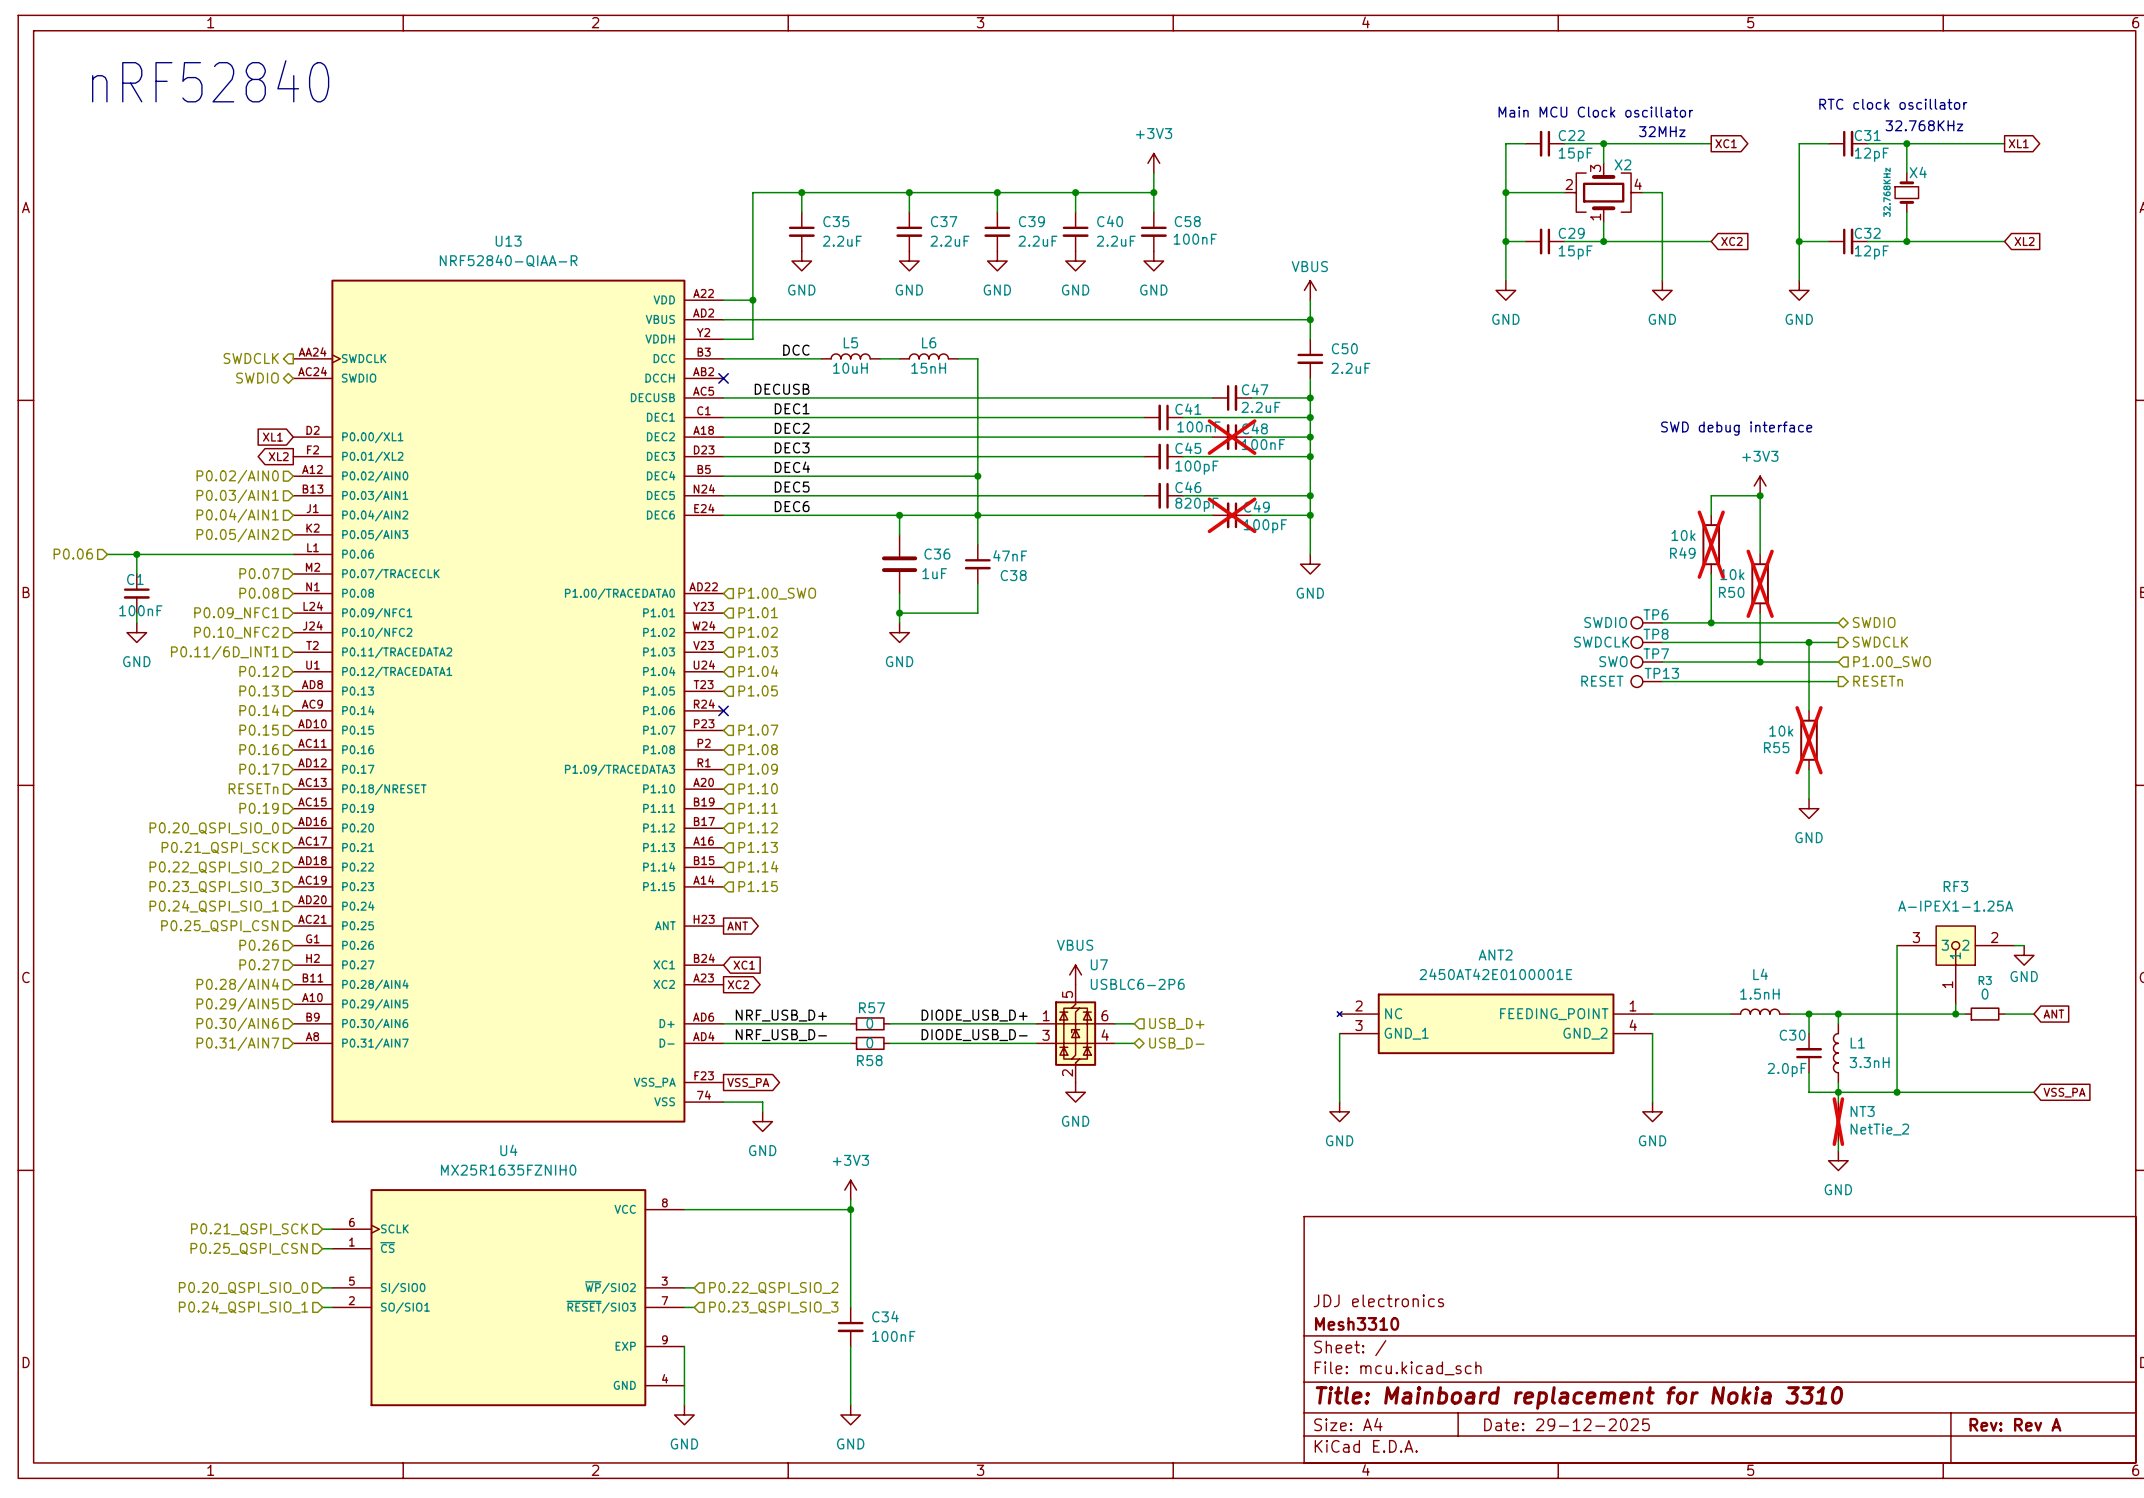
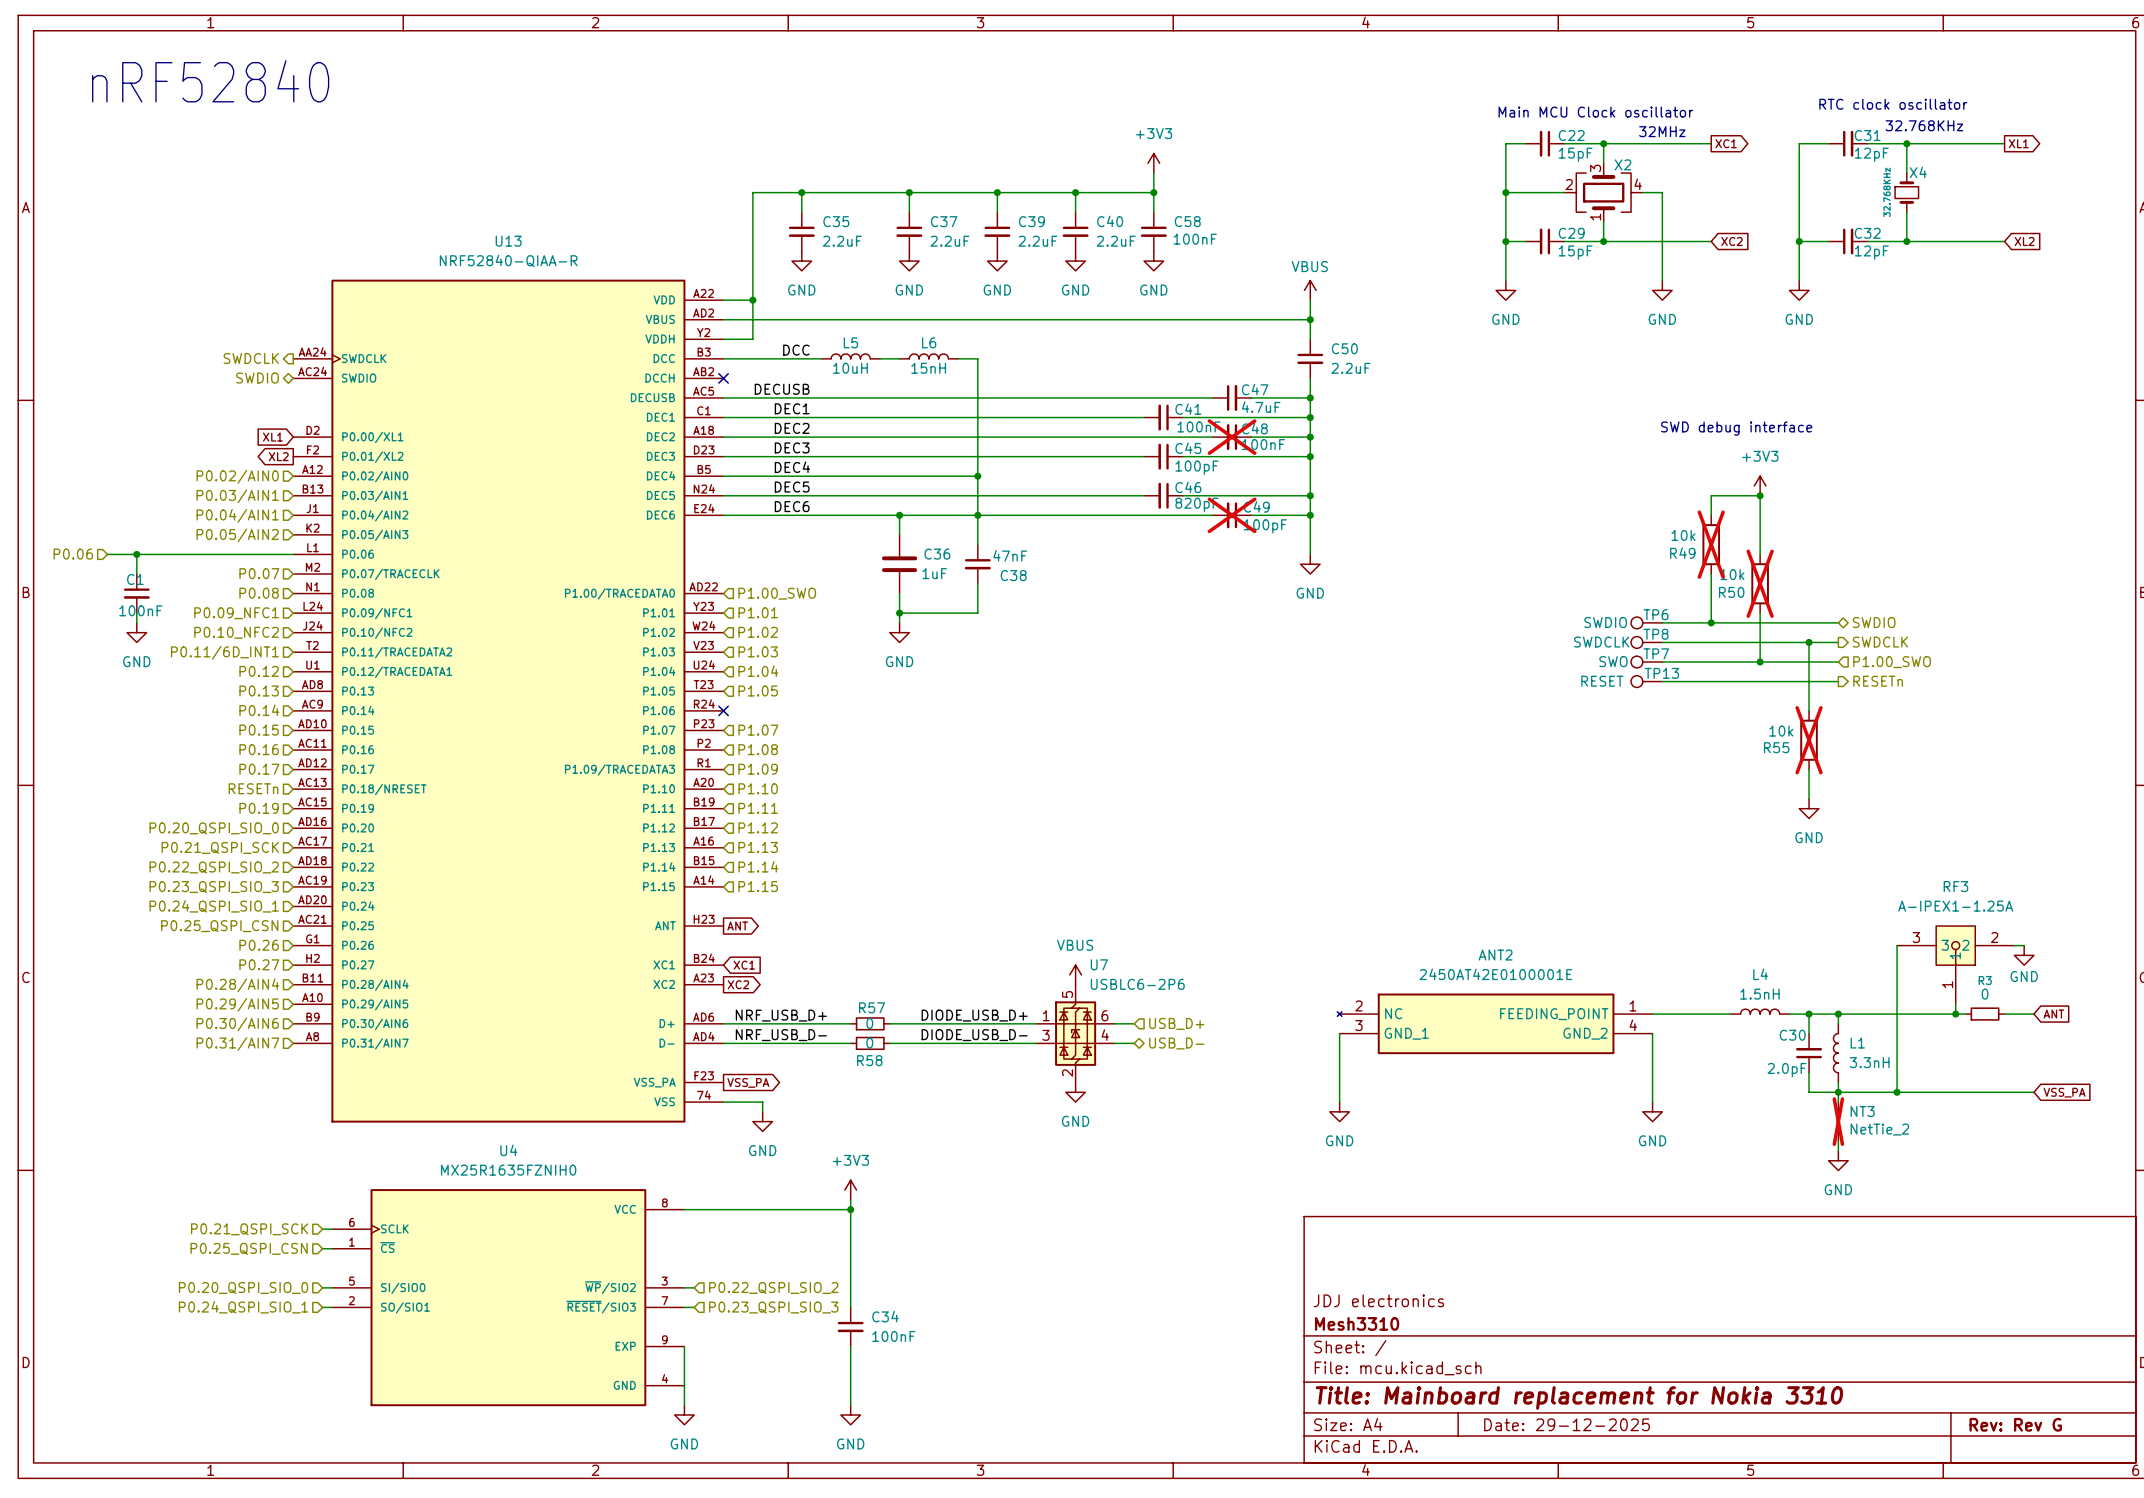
C47 value: 2.2uF (1260, 407) -> 4.7uF (1261, 407)
title block: Rev: Rev A (2015, 1424) -> Rev: Rev G (2015, 1424)

